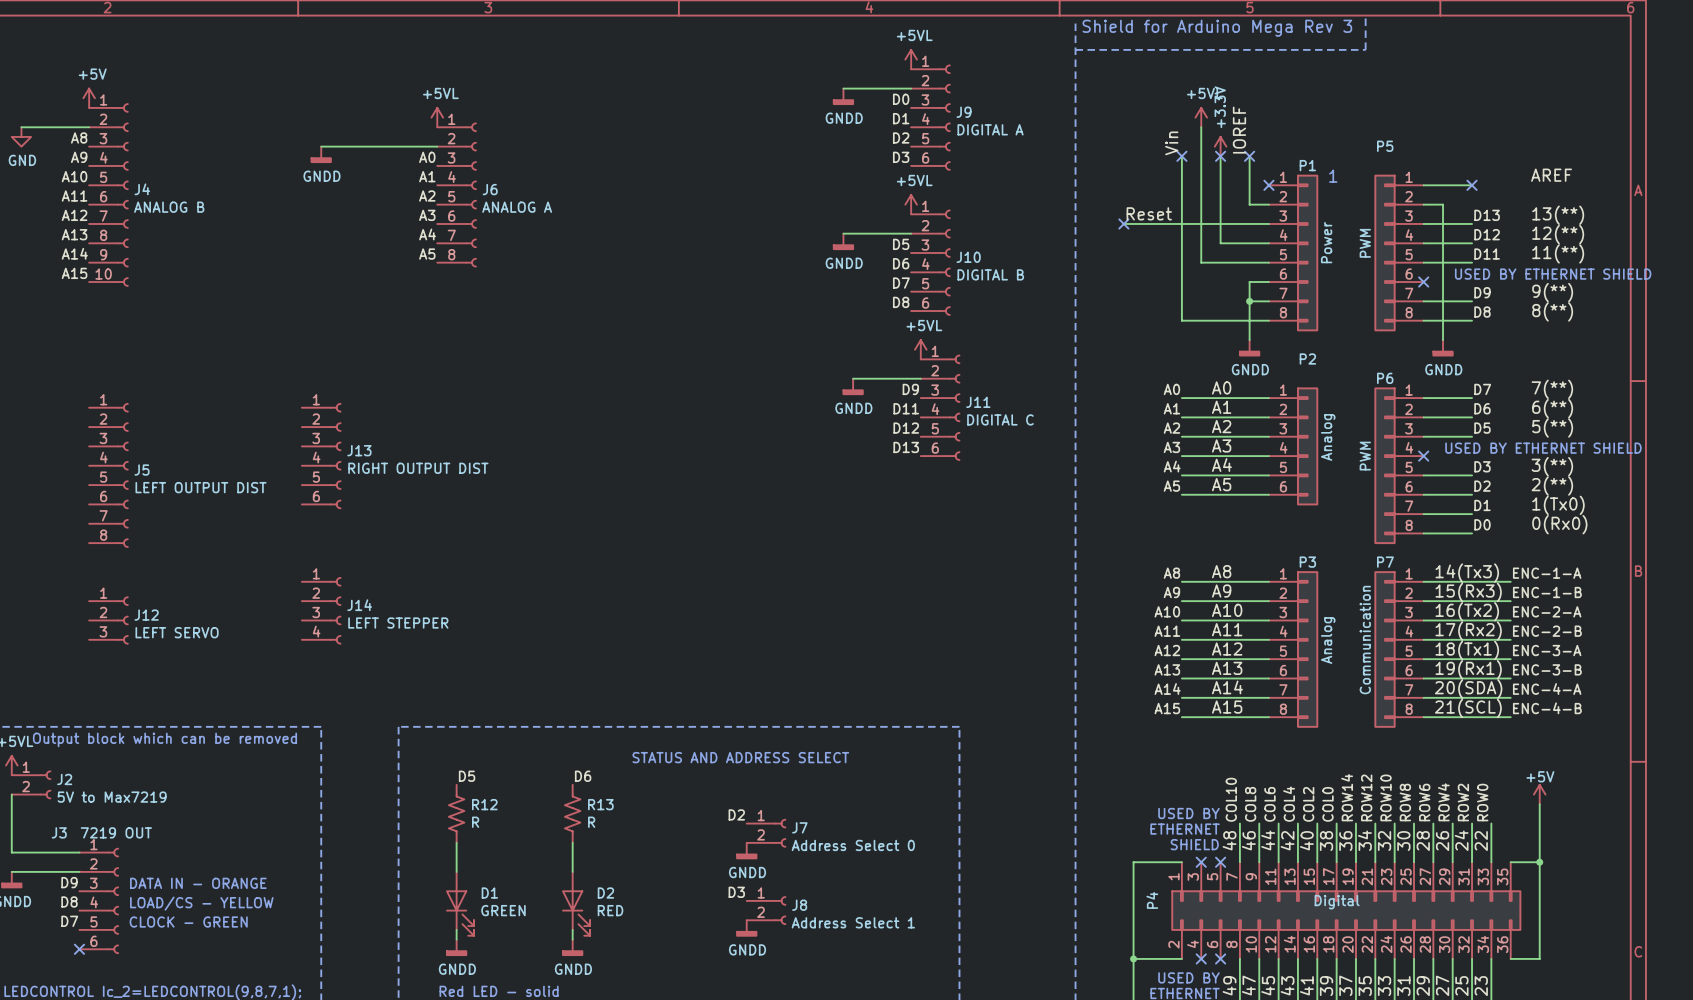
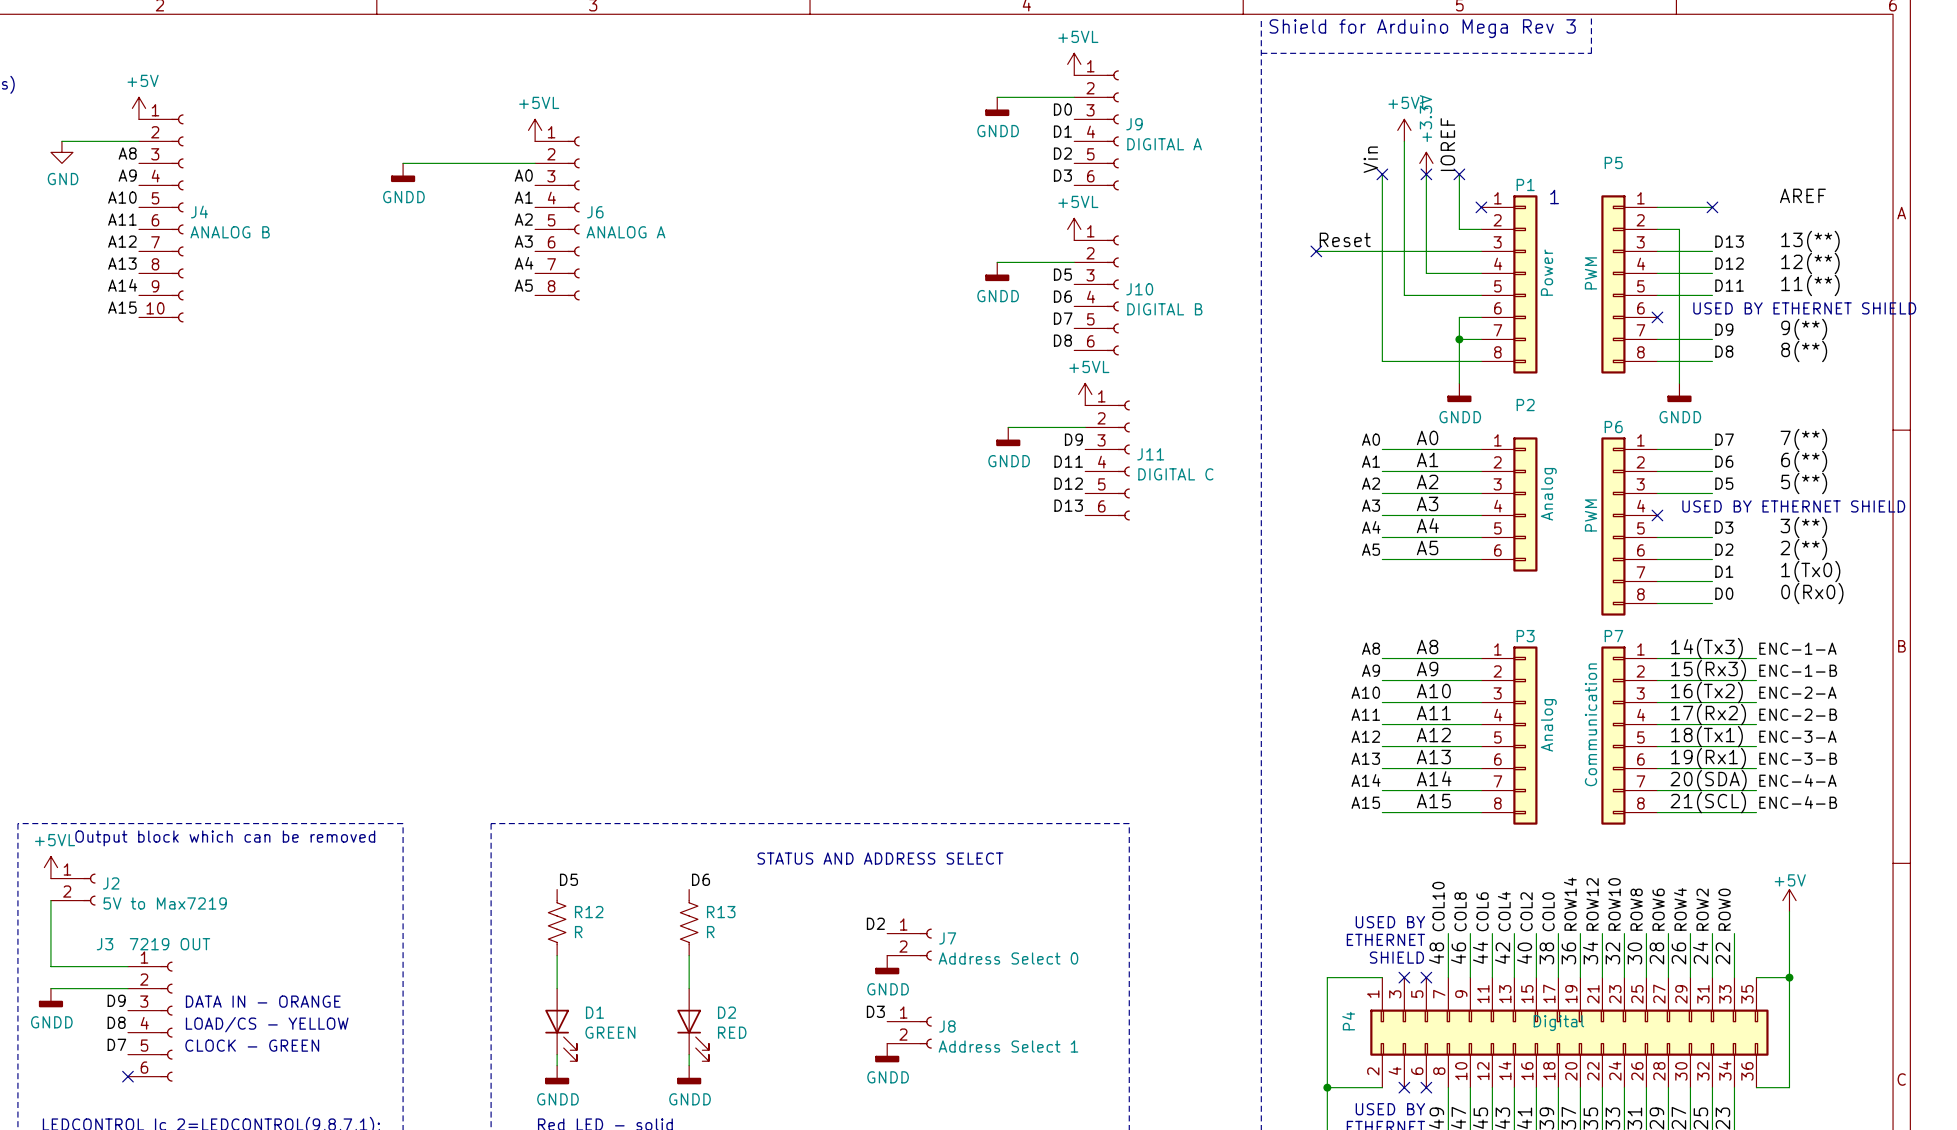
J13: RIGHT OUTPUT DIST (321, 456) -> none
J5: LEFT OUTPUT DIST (108, 475) -> none
J14: LEFT STEPPER (321, 610) -> none
J12: LEFT SERVO (108, 620) -> none

